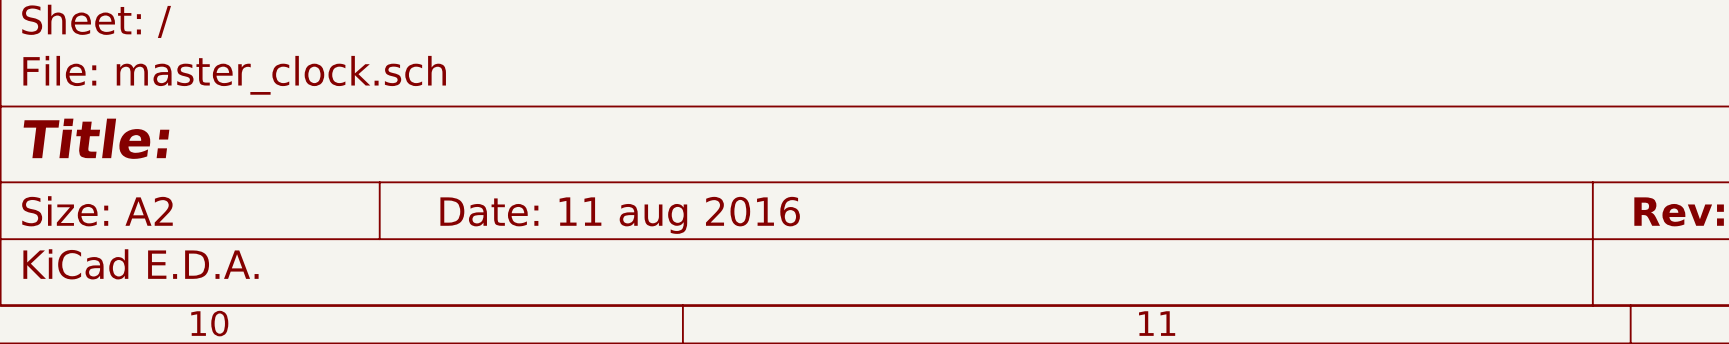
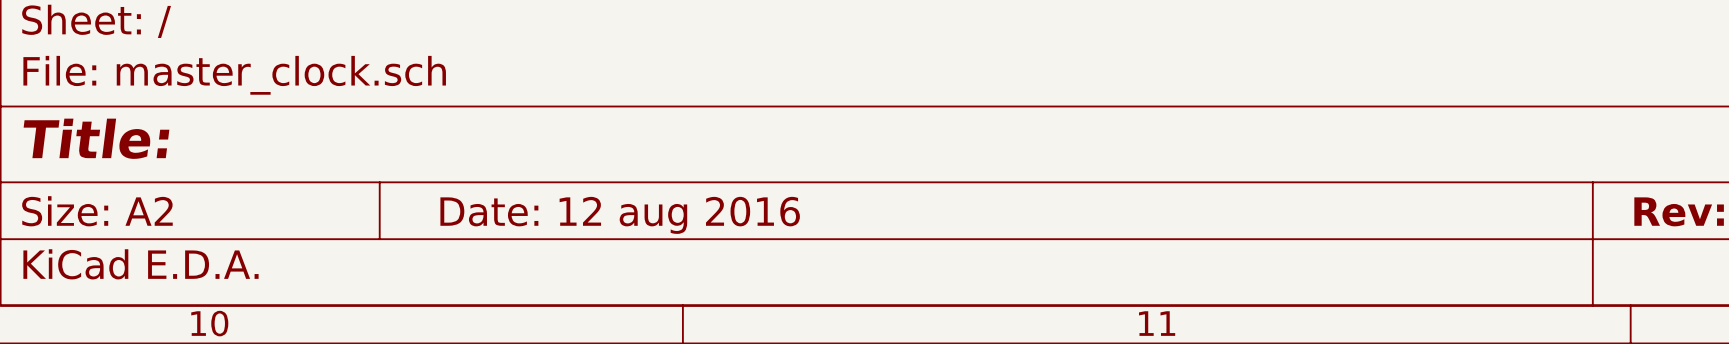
title block: Date: 11 aug 2016 (620, 215) -> Date: 12 aug 2016 (620, 215)

